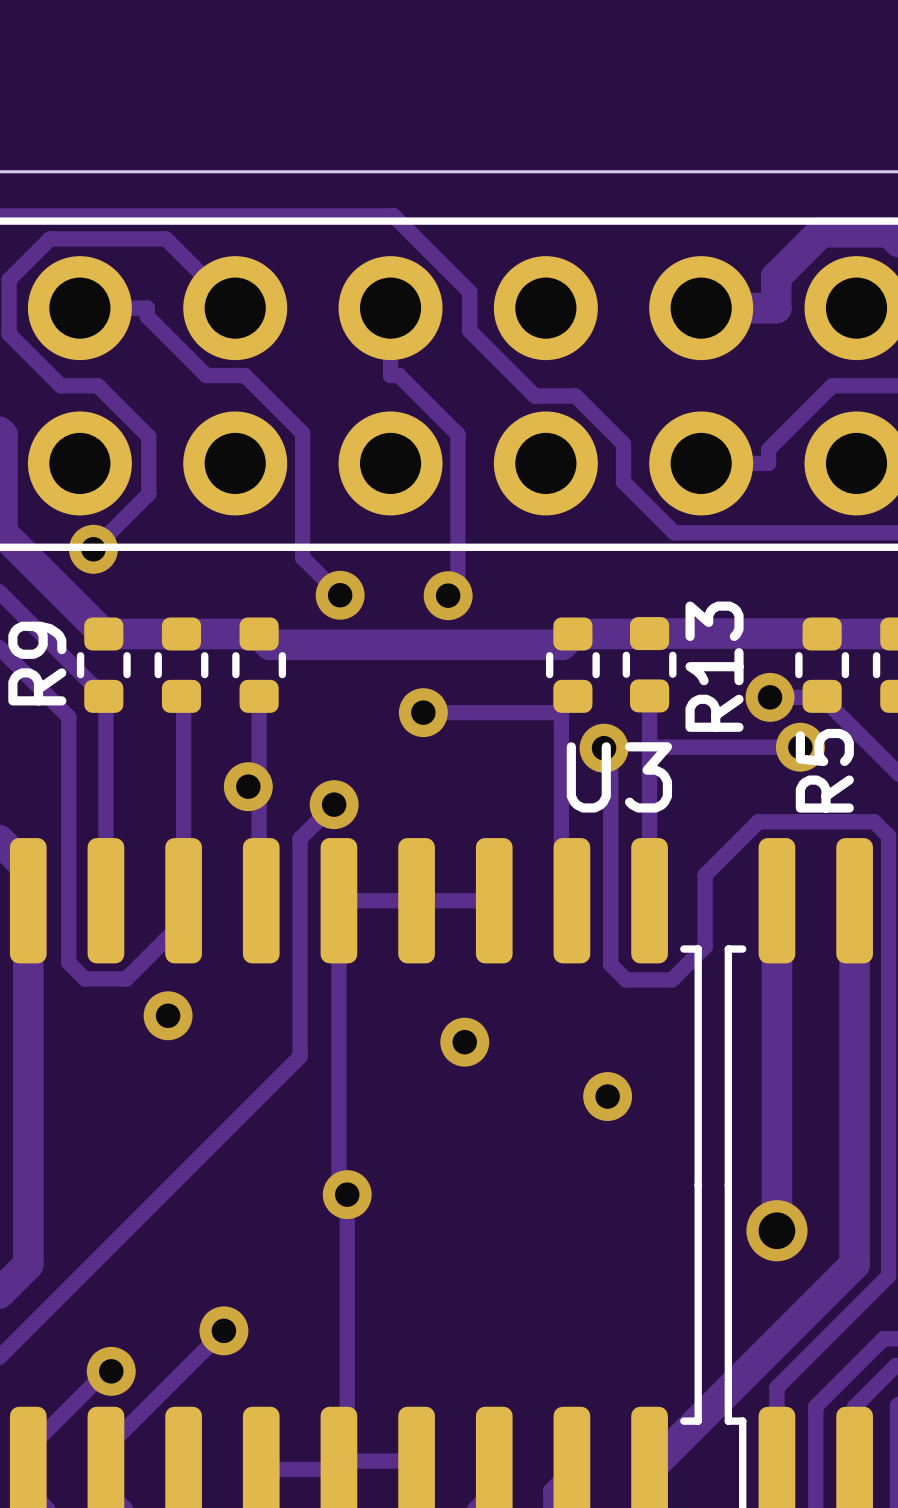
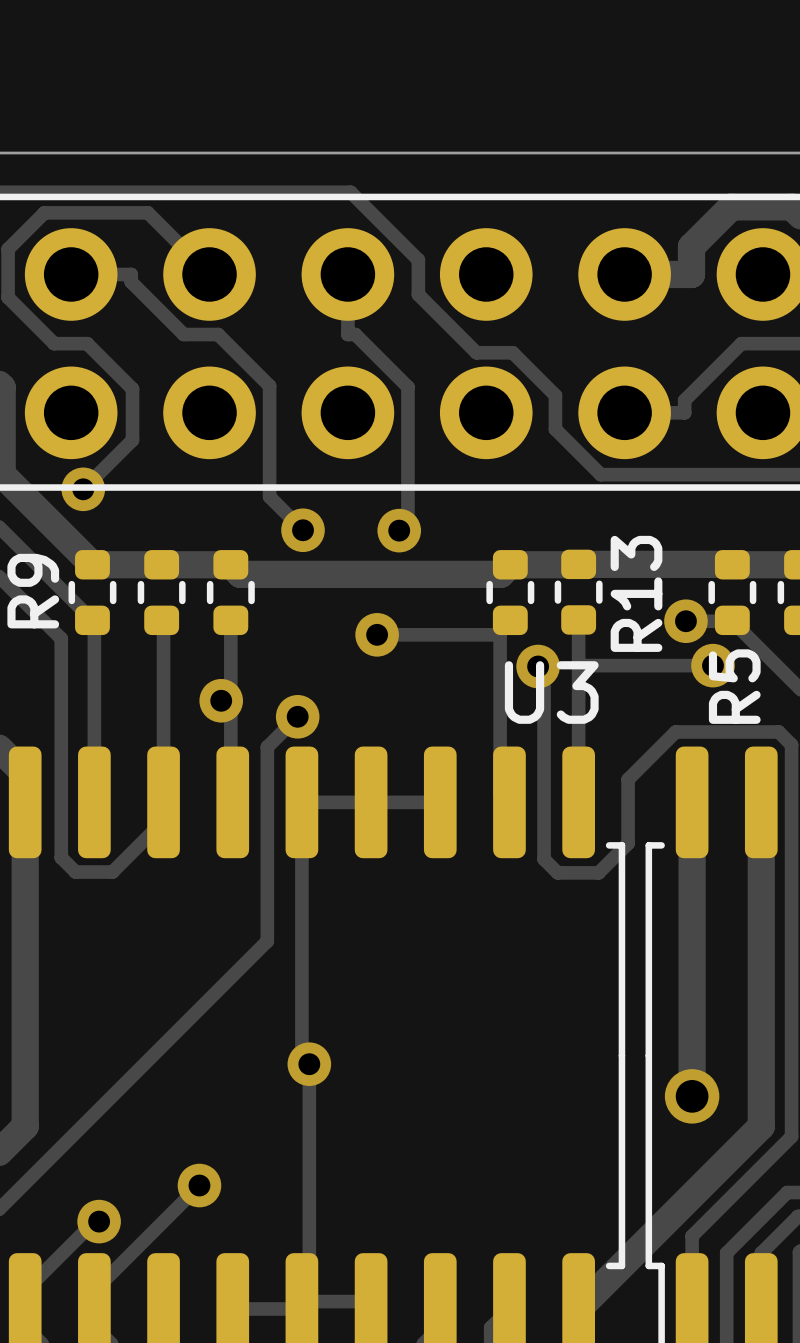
via: (168, 1015) -> none
via: (464, 1042) -> none
via: (607, 1096) -> none

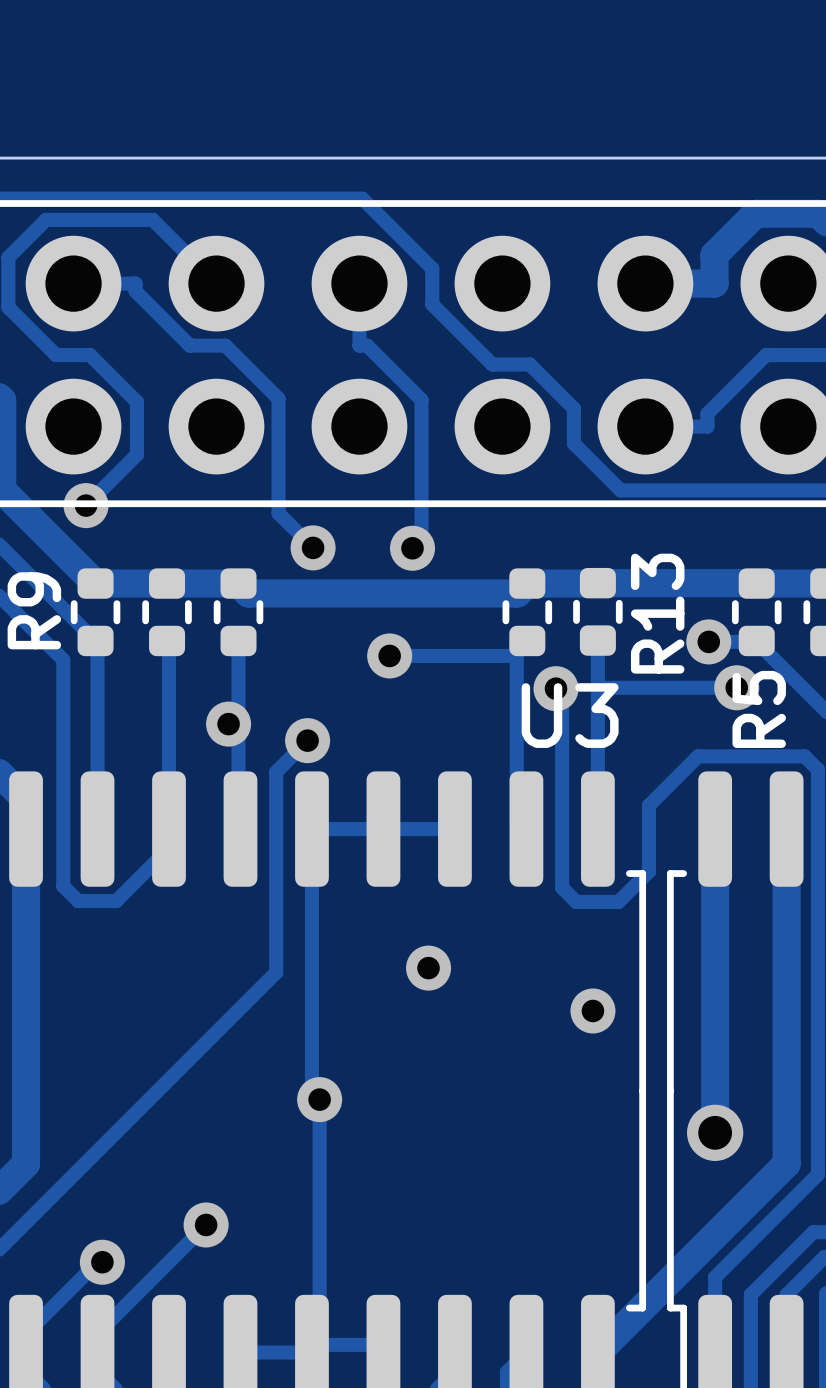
via: none -> (428, 968)
via: none -> (592, 1010)

